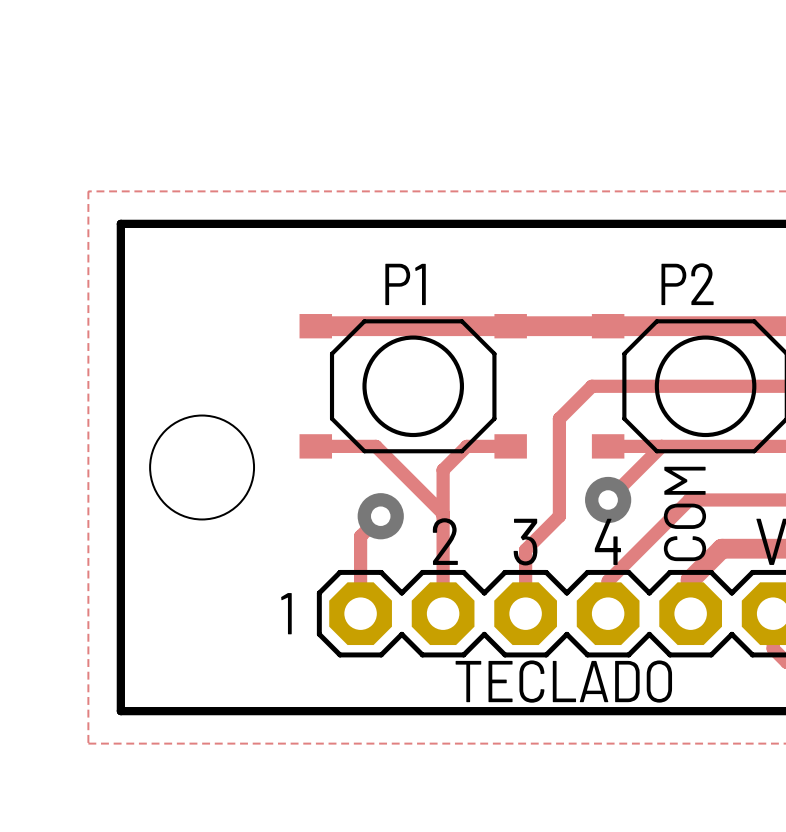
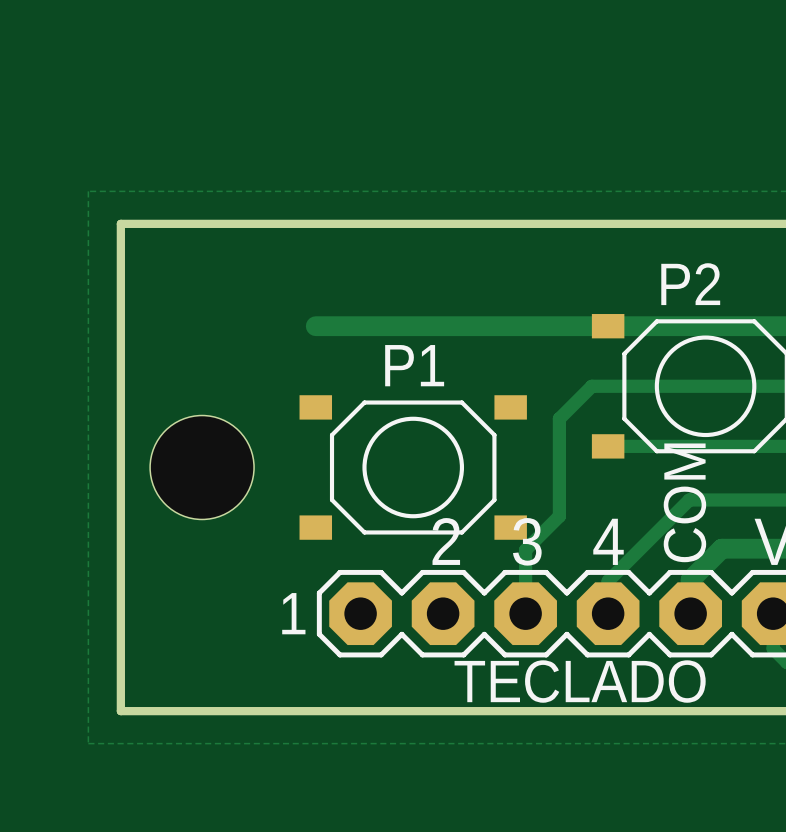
P1 position: (413, 386) -> (413, 467)
track: (315, 446) (375, 446) (443, 513) -> none
track: (510, 446) (466, 446) (443, 470) (443, 613) -> none
track: (661, 446) (608, 499) -> none
via: (608, 499) -> none
track: (380, 516) (360, 536) (360, 613) -> none
via: (380, 516) -> none

